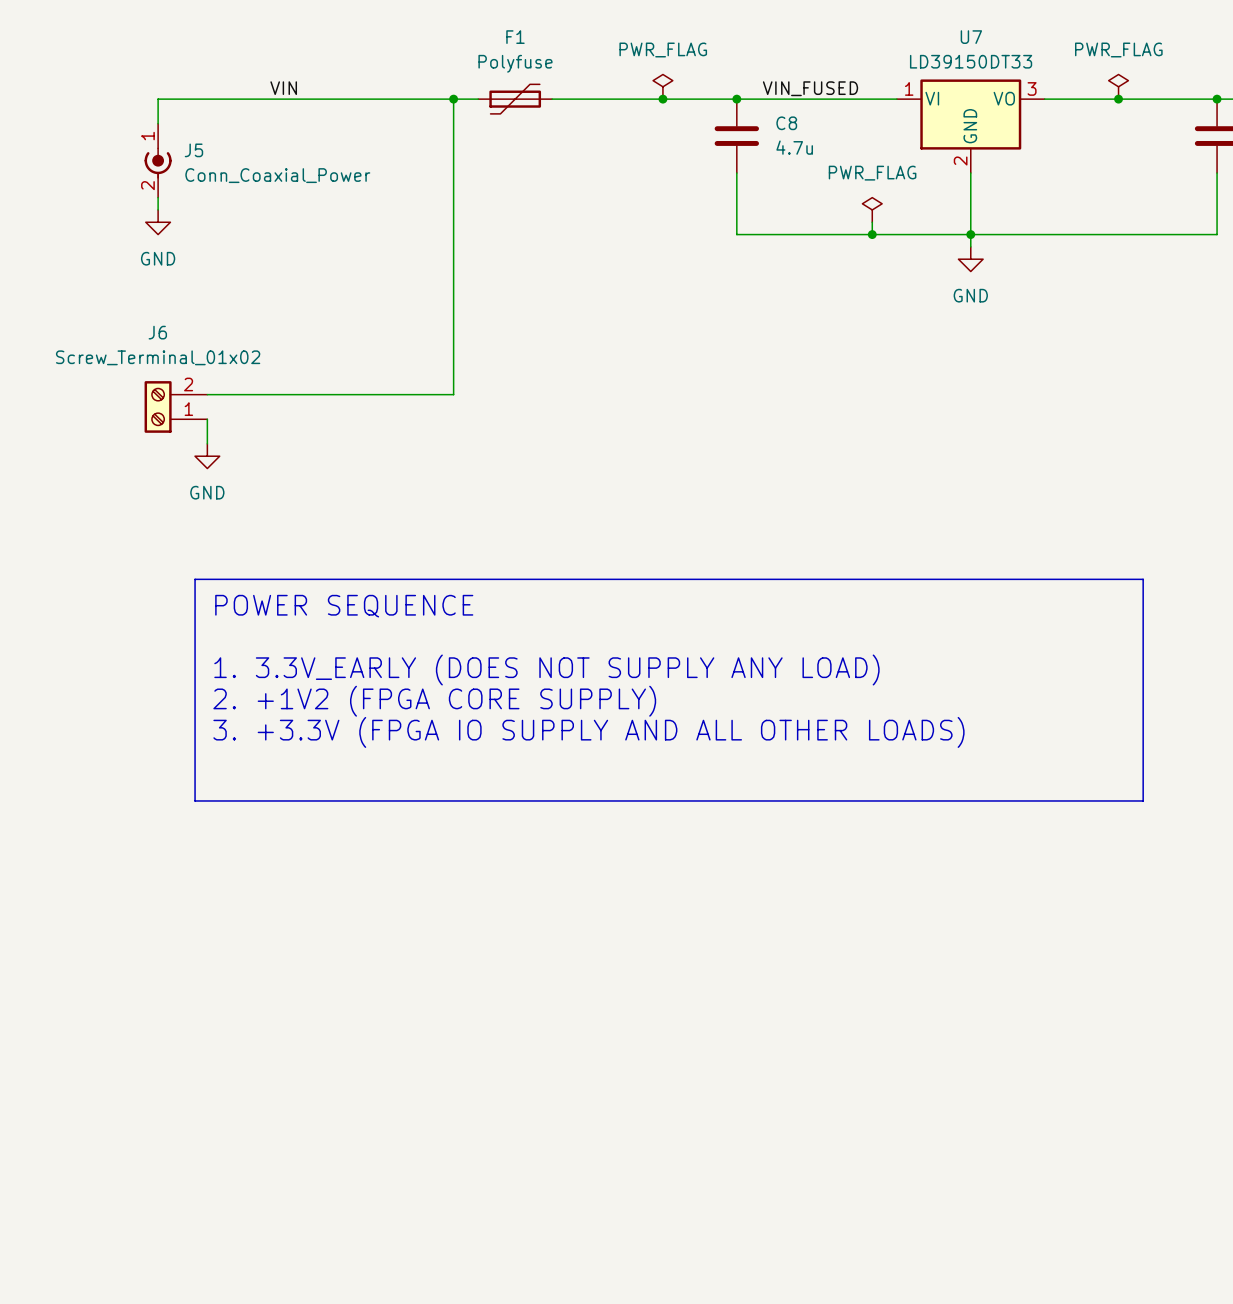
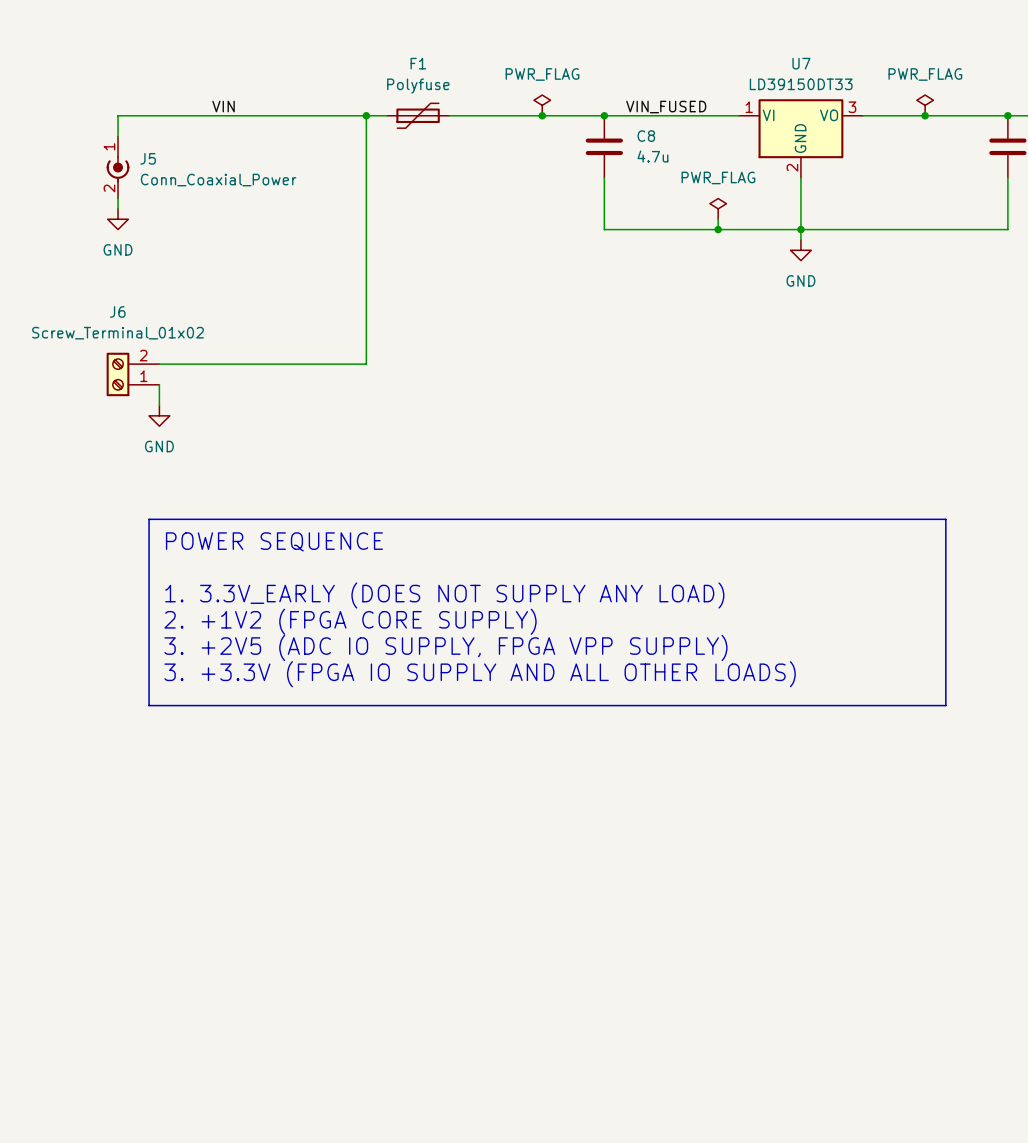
text: 3. +3.3V (FPGA IO SUPPLY AND ALL OTHER LOADS) (588, 732) -> 3. +2V5 (ADC IO SUPPLY, FPGA VPP SUPPLY) (445, 647)
text: none -> 3. +3.3V (FPGA IO SUPPLY AND ALL OTHER LOADS) (480, 674)

